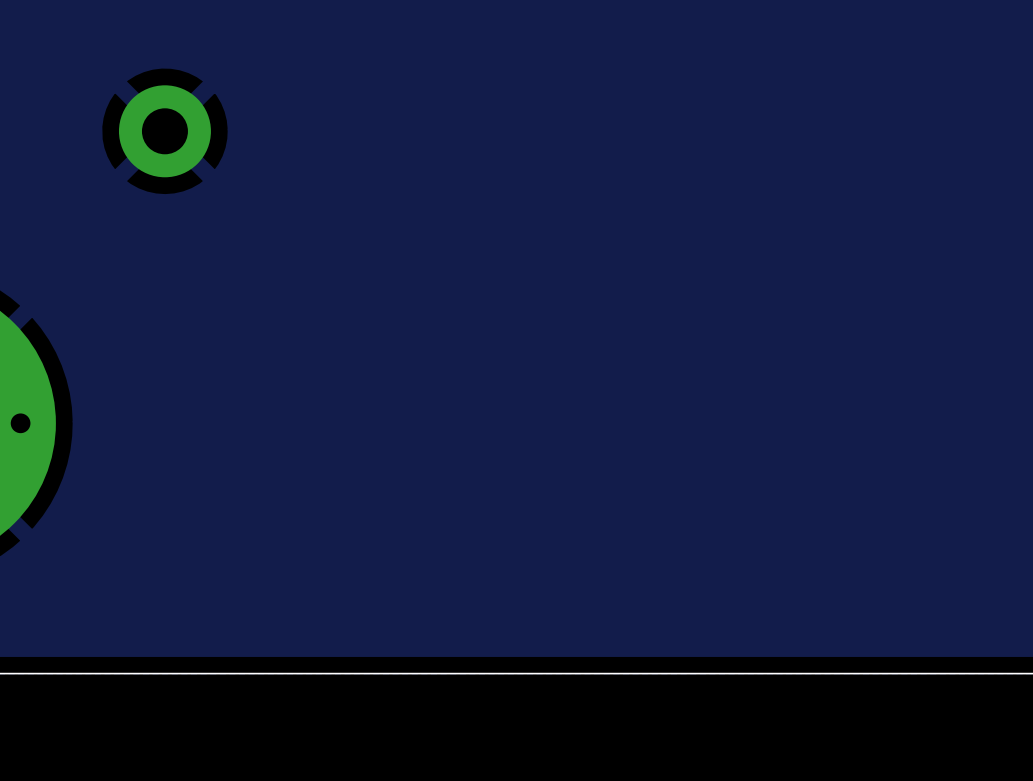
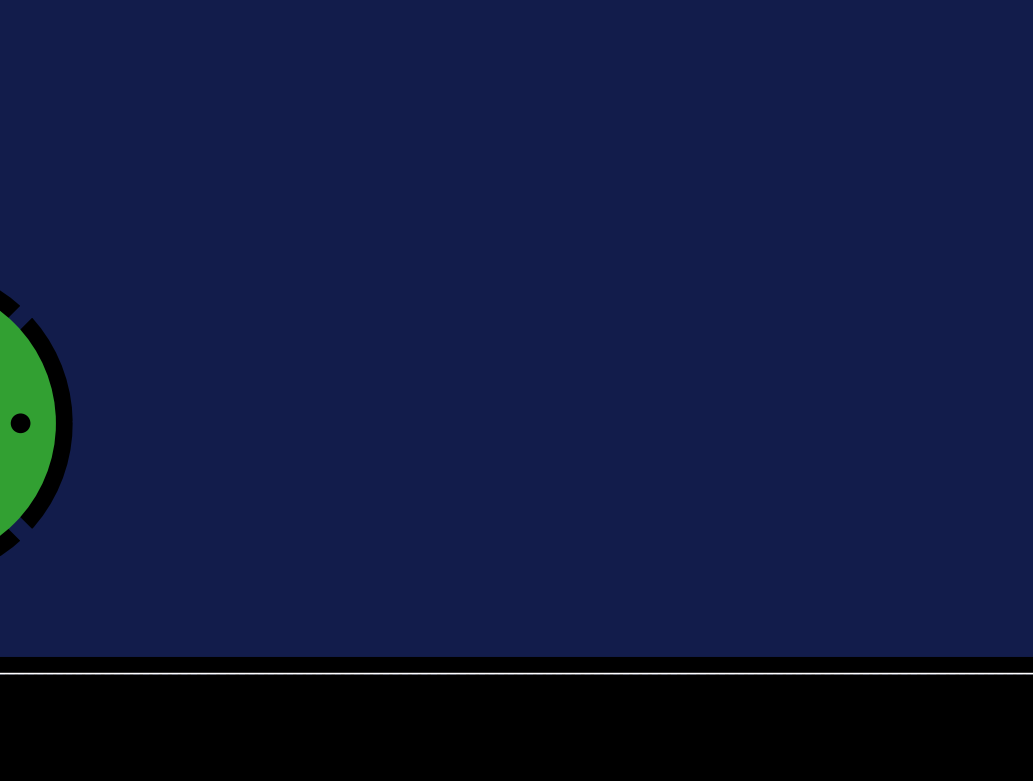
part: (164, 131) -> none

